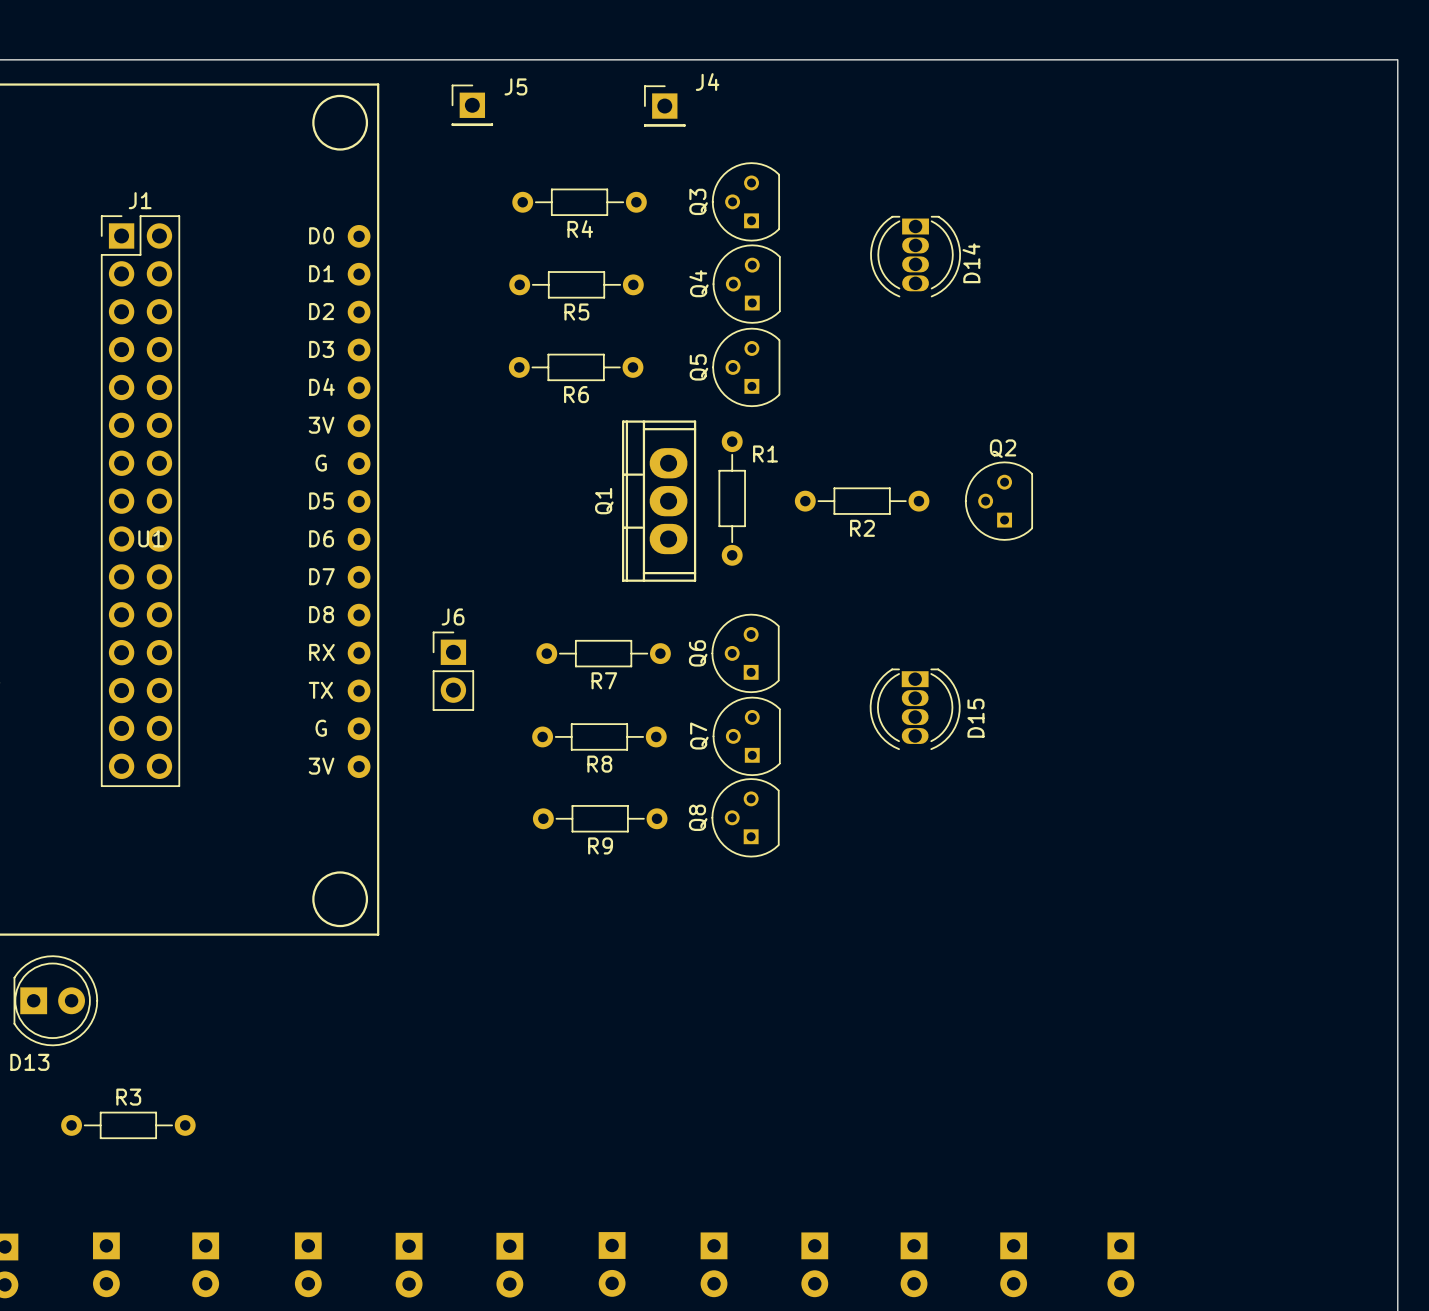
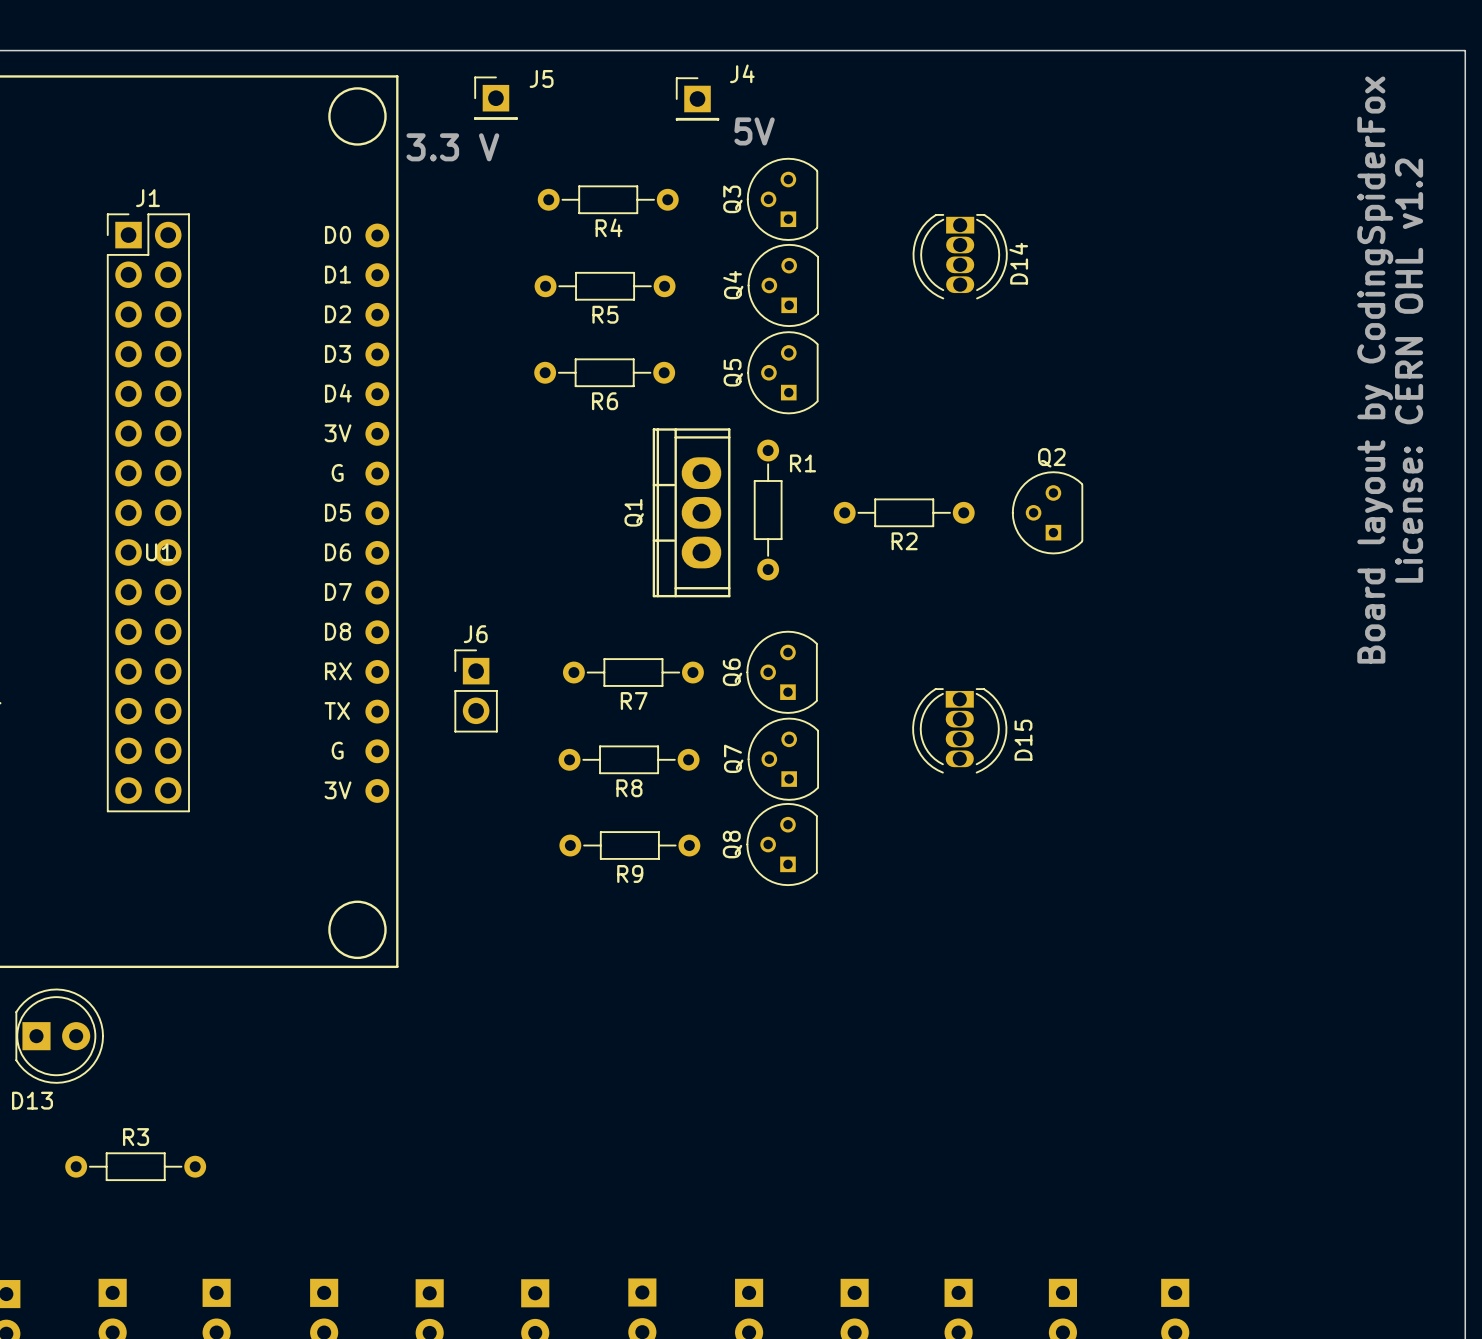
text: none -> 5V (754, 131)
text: none -> 3.3 V (452, 147)
text: none -> Board layout by CodingSpiderFox (1375, 370)
text: none -> License: CERN OHL v1.2 (1409, 370)

